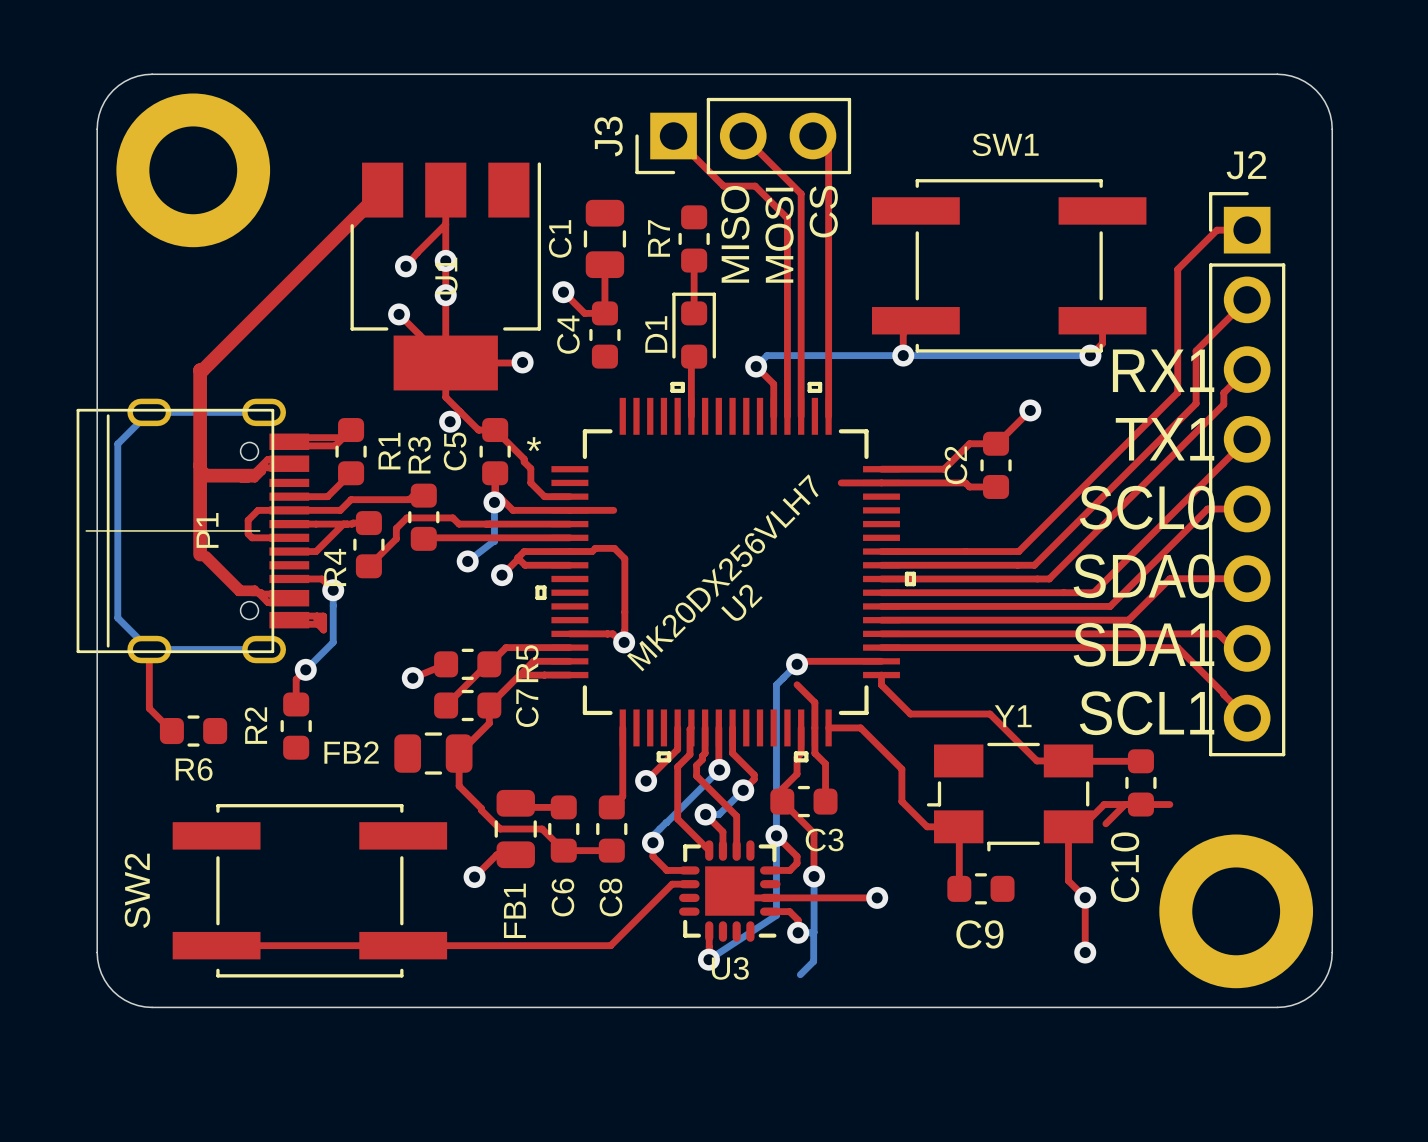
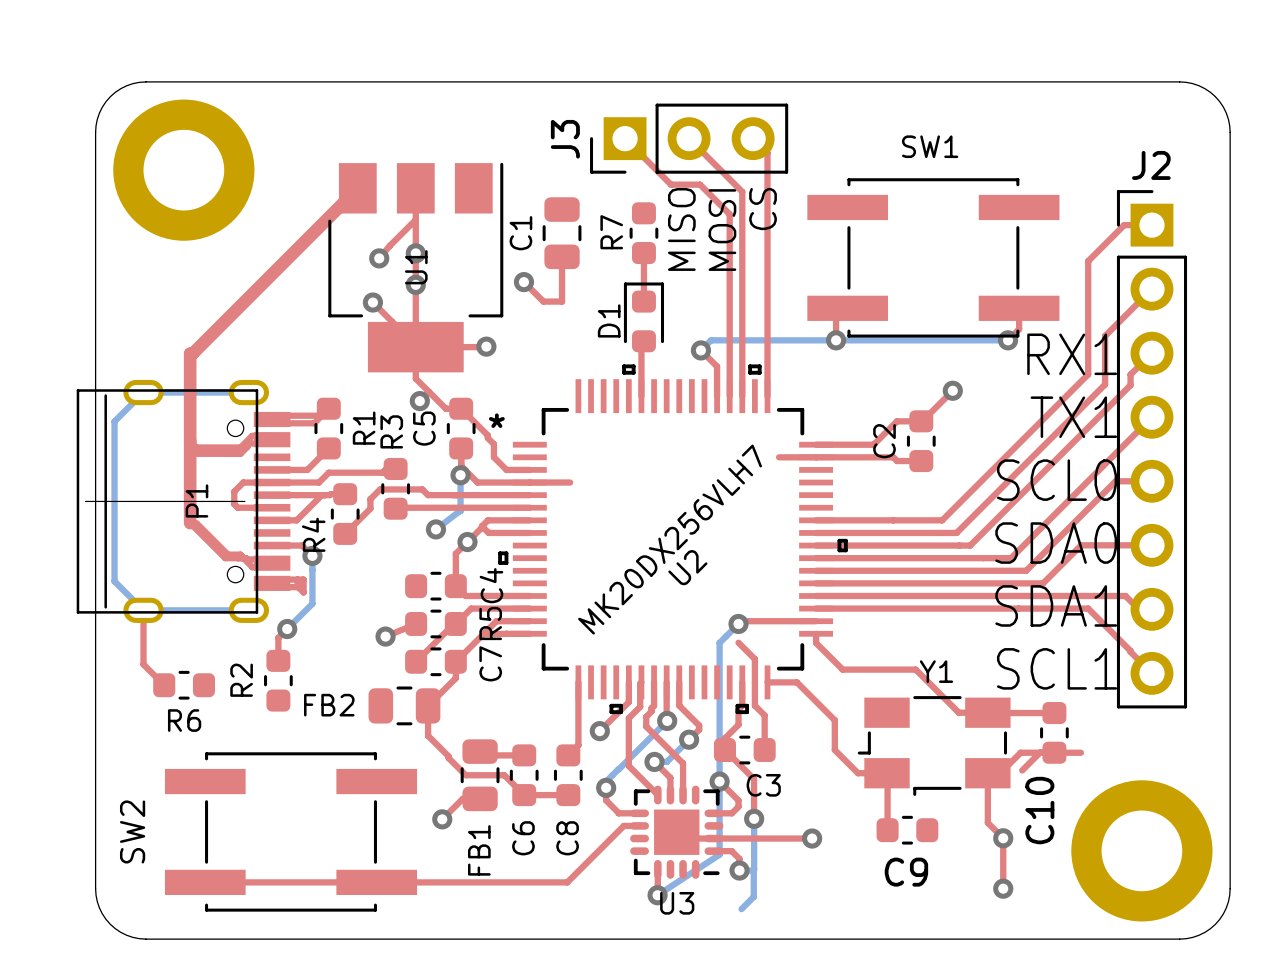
C4 name position: C4 (568, 334) -> C4 (491, 585)
C4 rotation: 0° (604, 335) -> 90° clockwise (435, 586)
C4 position: (604, 335) -> (435, 586)
top track: (569, 551) (592, 551) (595, 548) (614, 548) (624, 558) (624, 642) (621, 642) (612, 633) (569, 633) -> (467, 542) (455, 553) (455, 586) (465, 595) (529, 595)
via: (624, 642) -> none

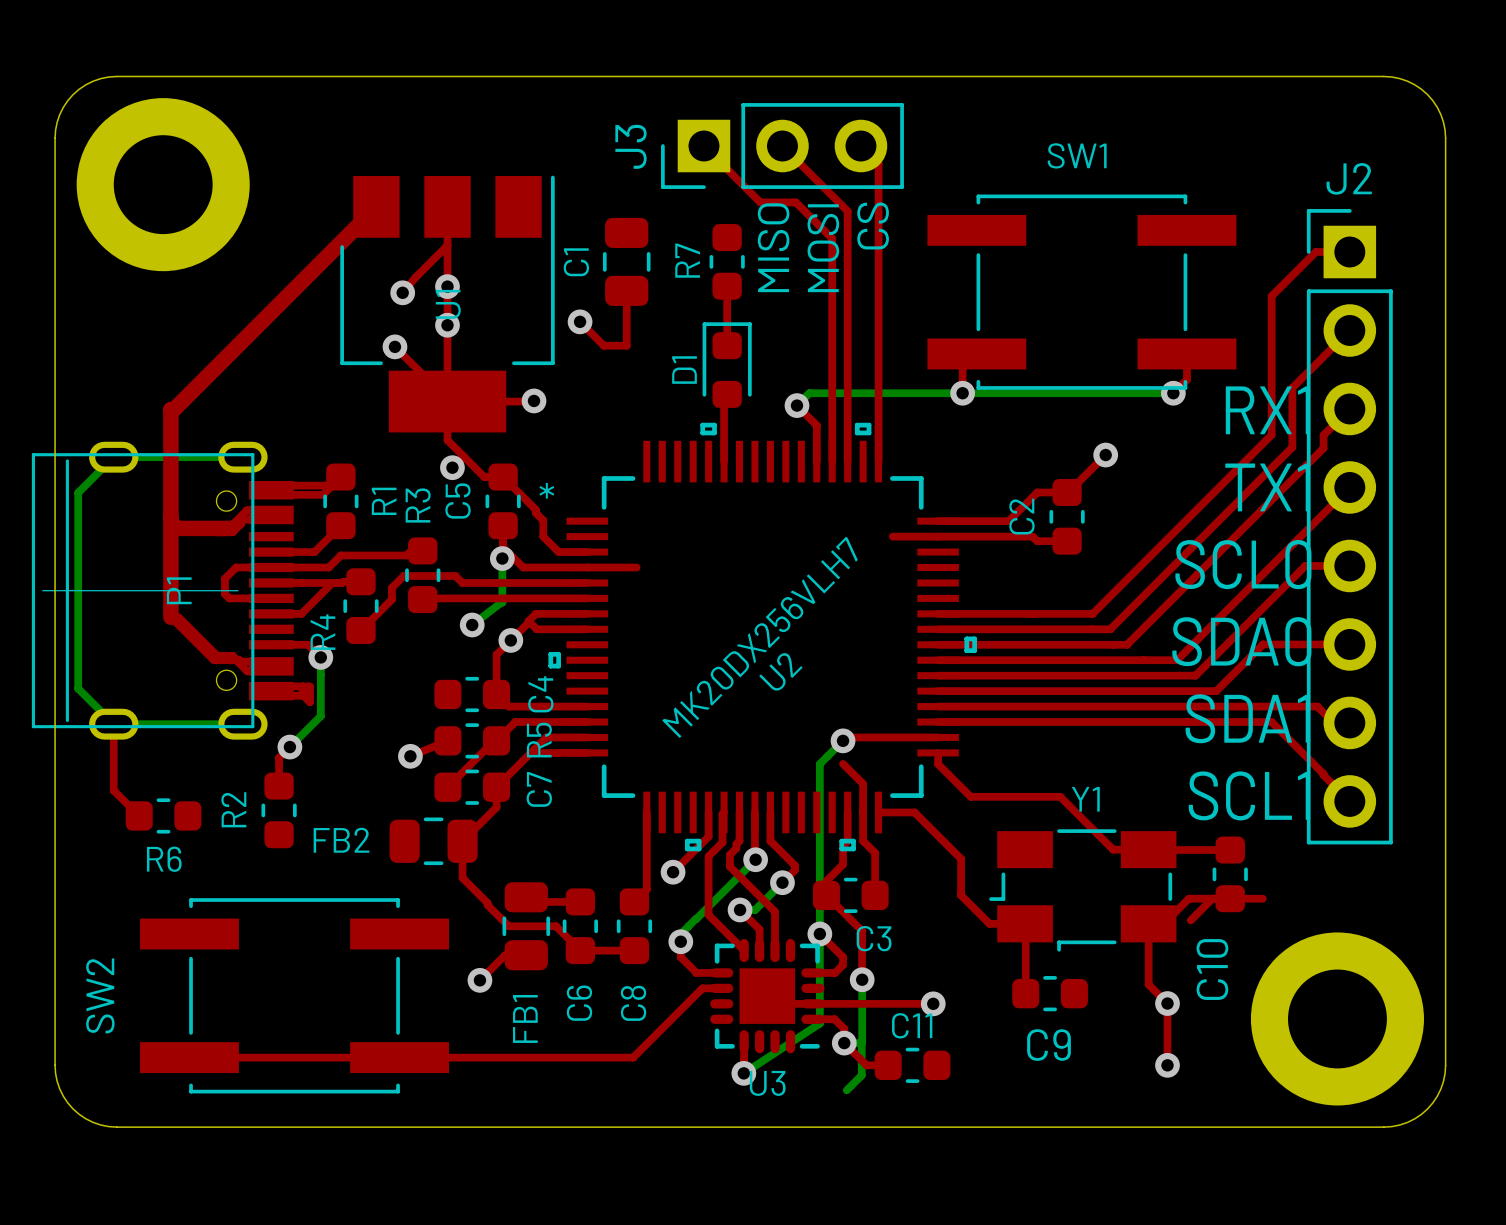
top track: none -> (844, 1043) (866, 1065) (888, 1065)
C11: none -> (912, 1065)

